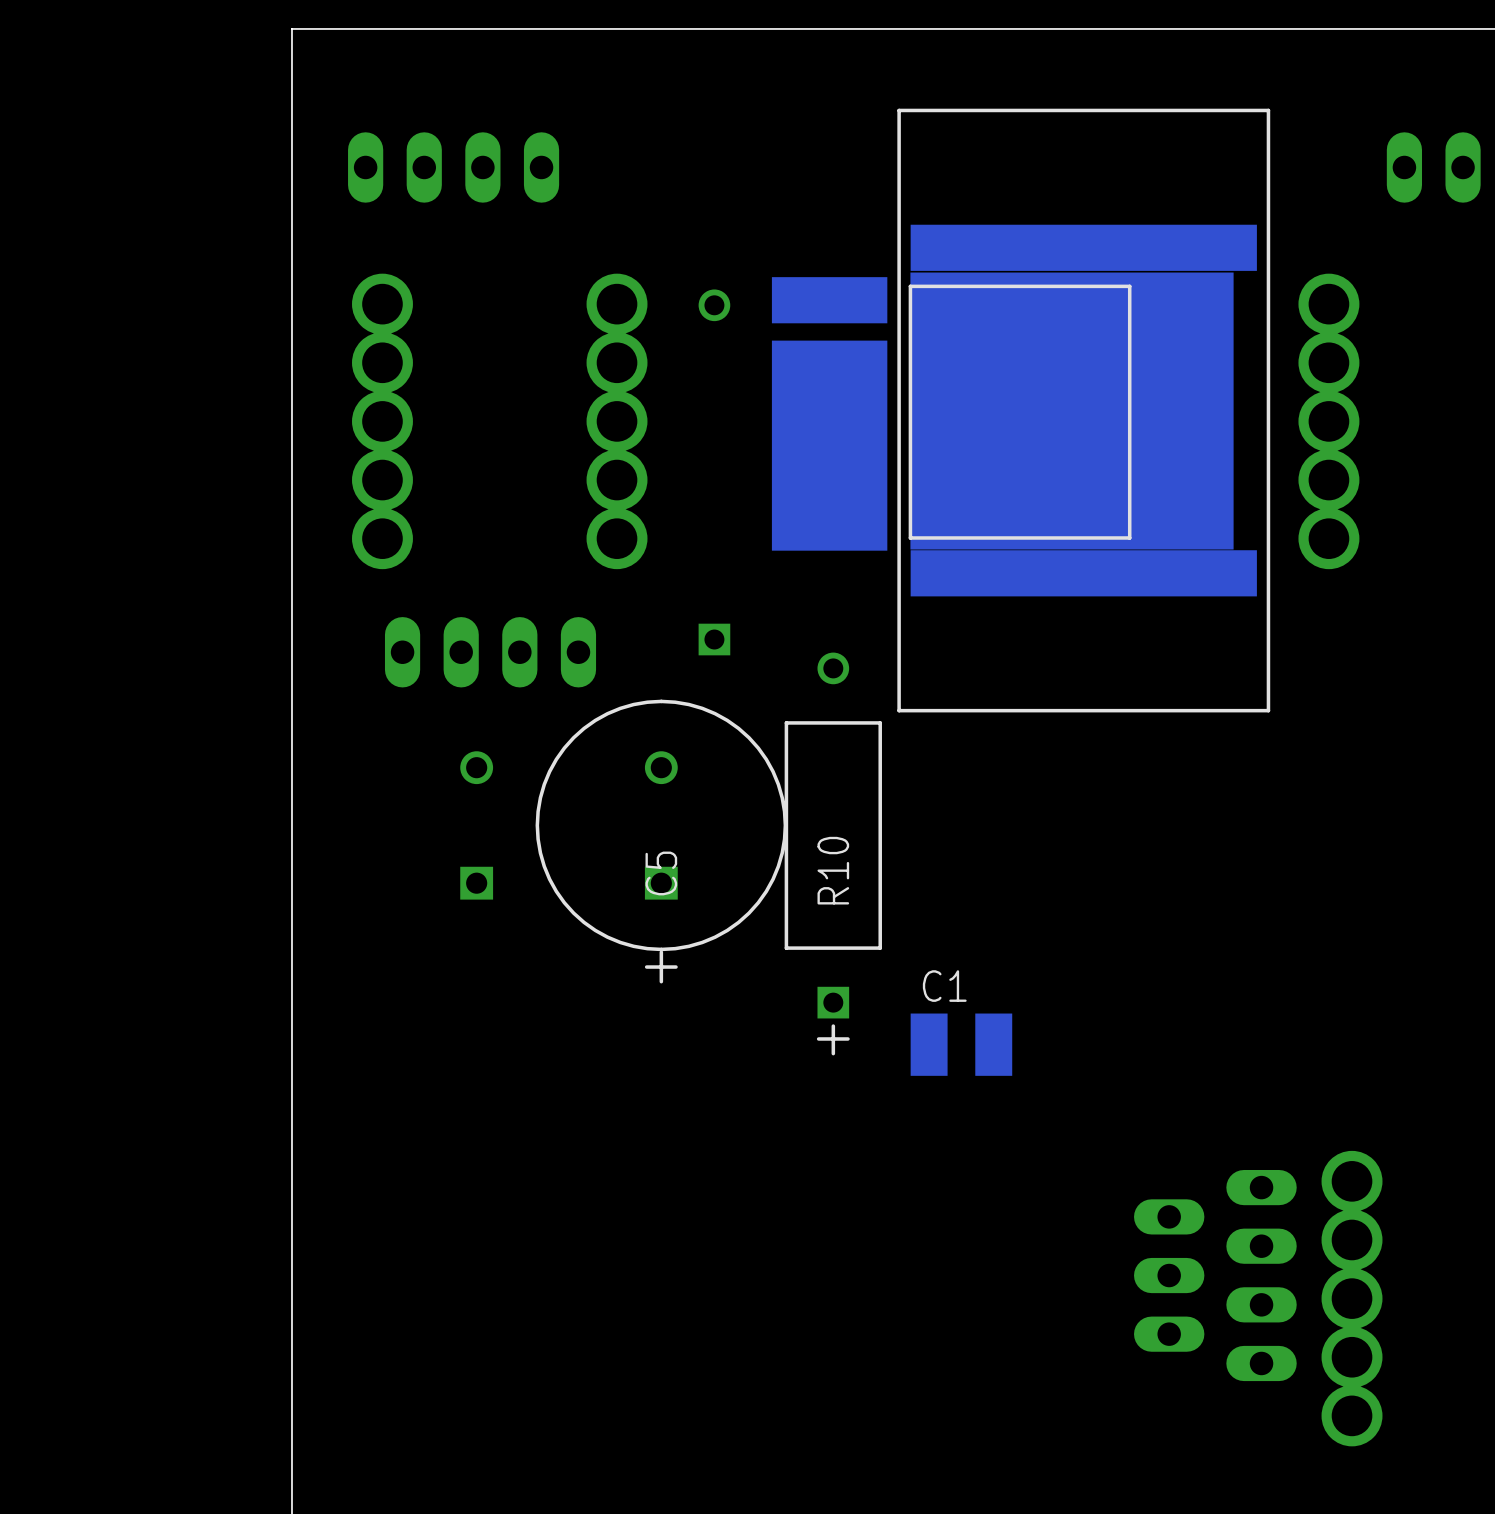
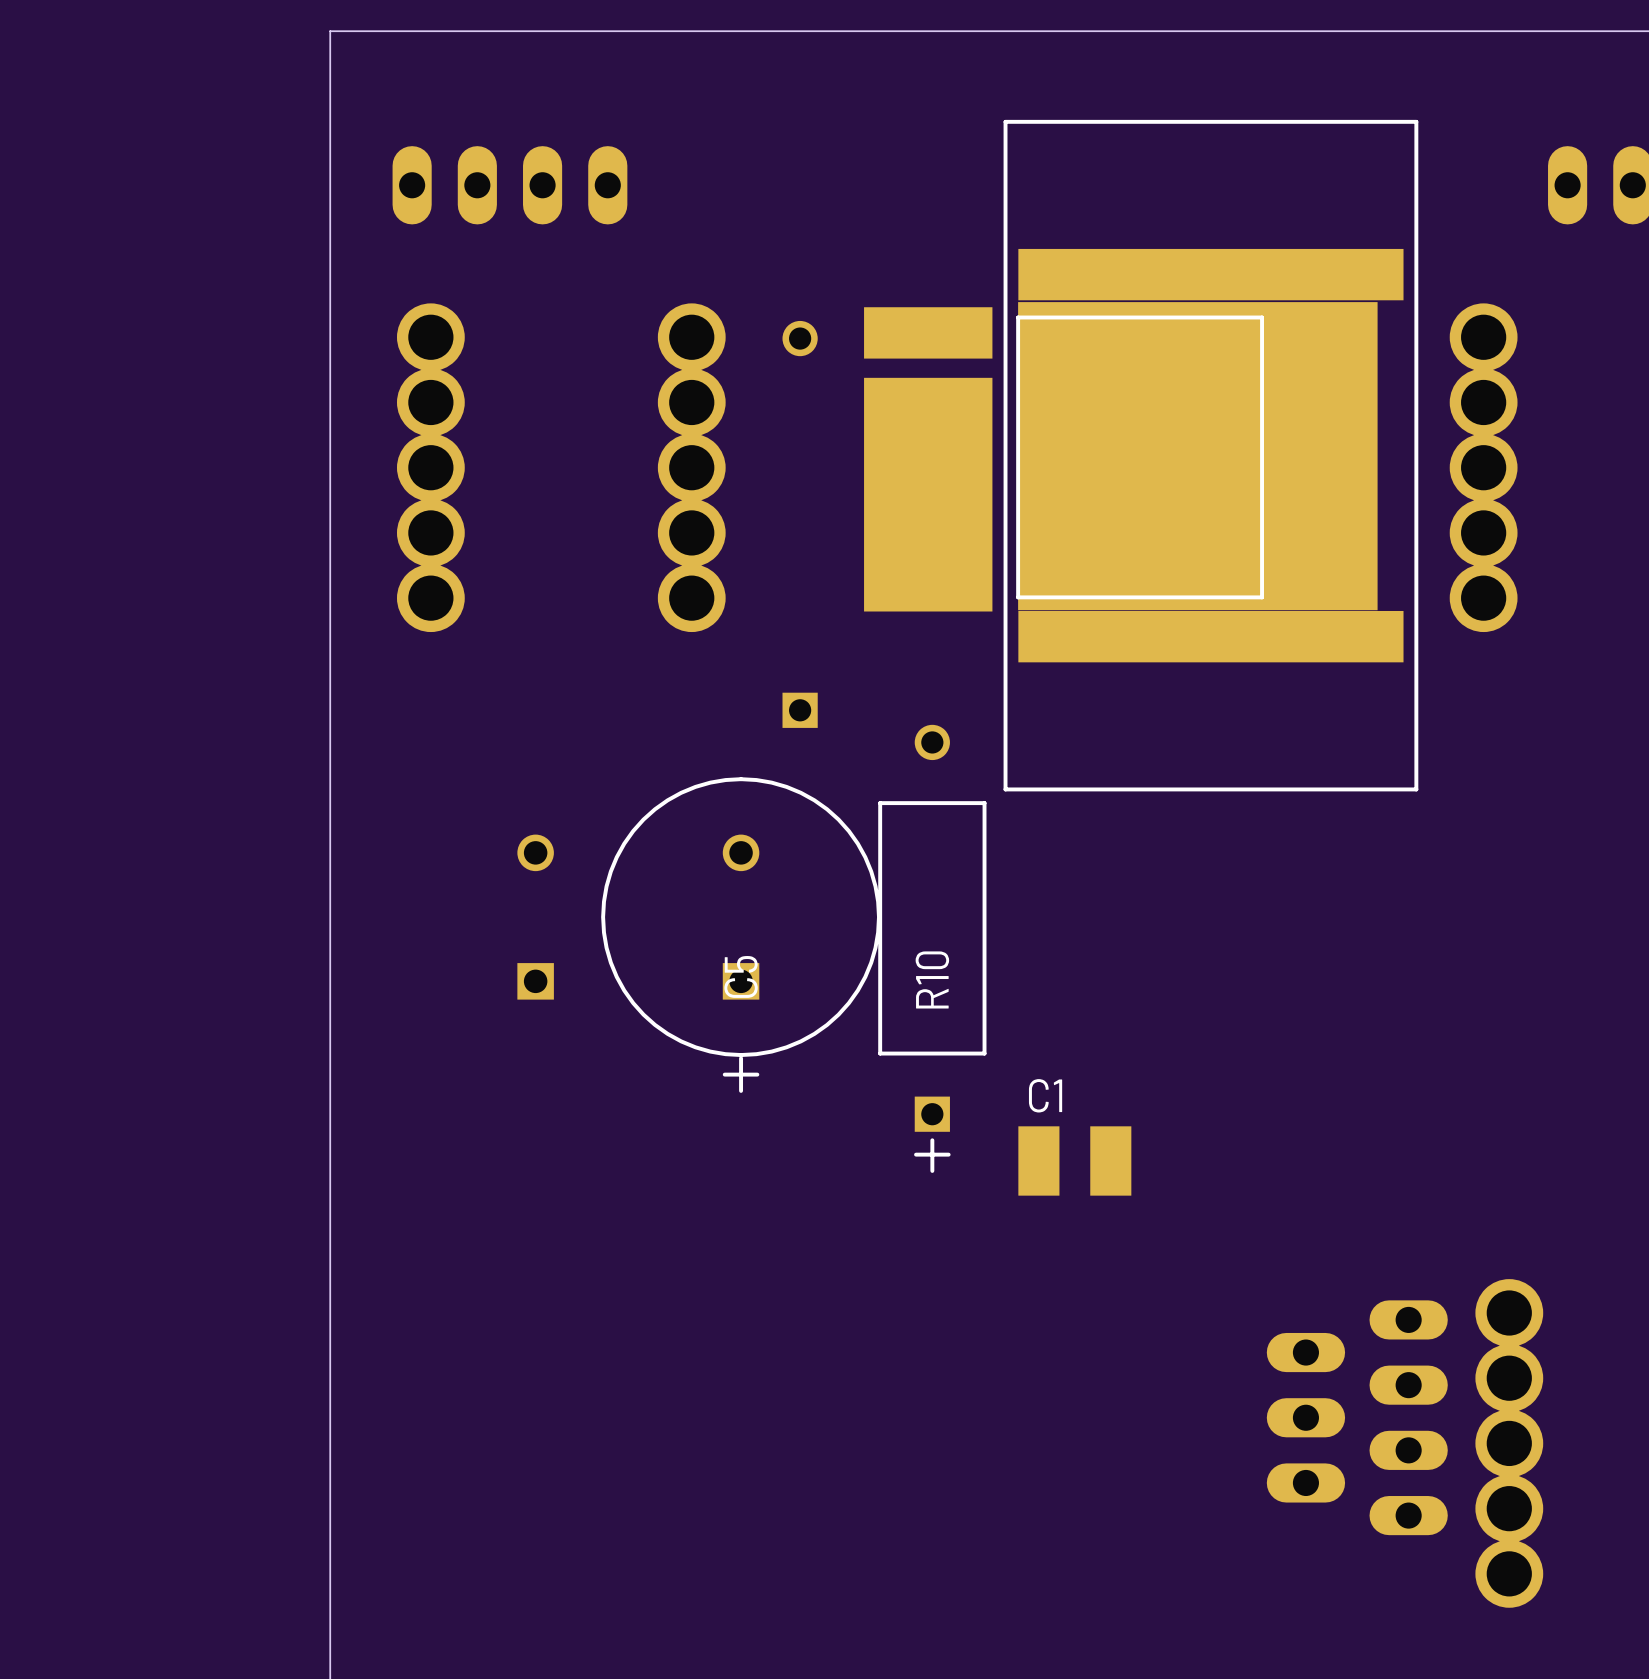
part: (490, 652) -> none

